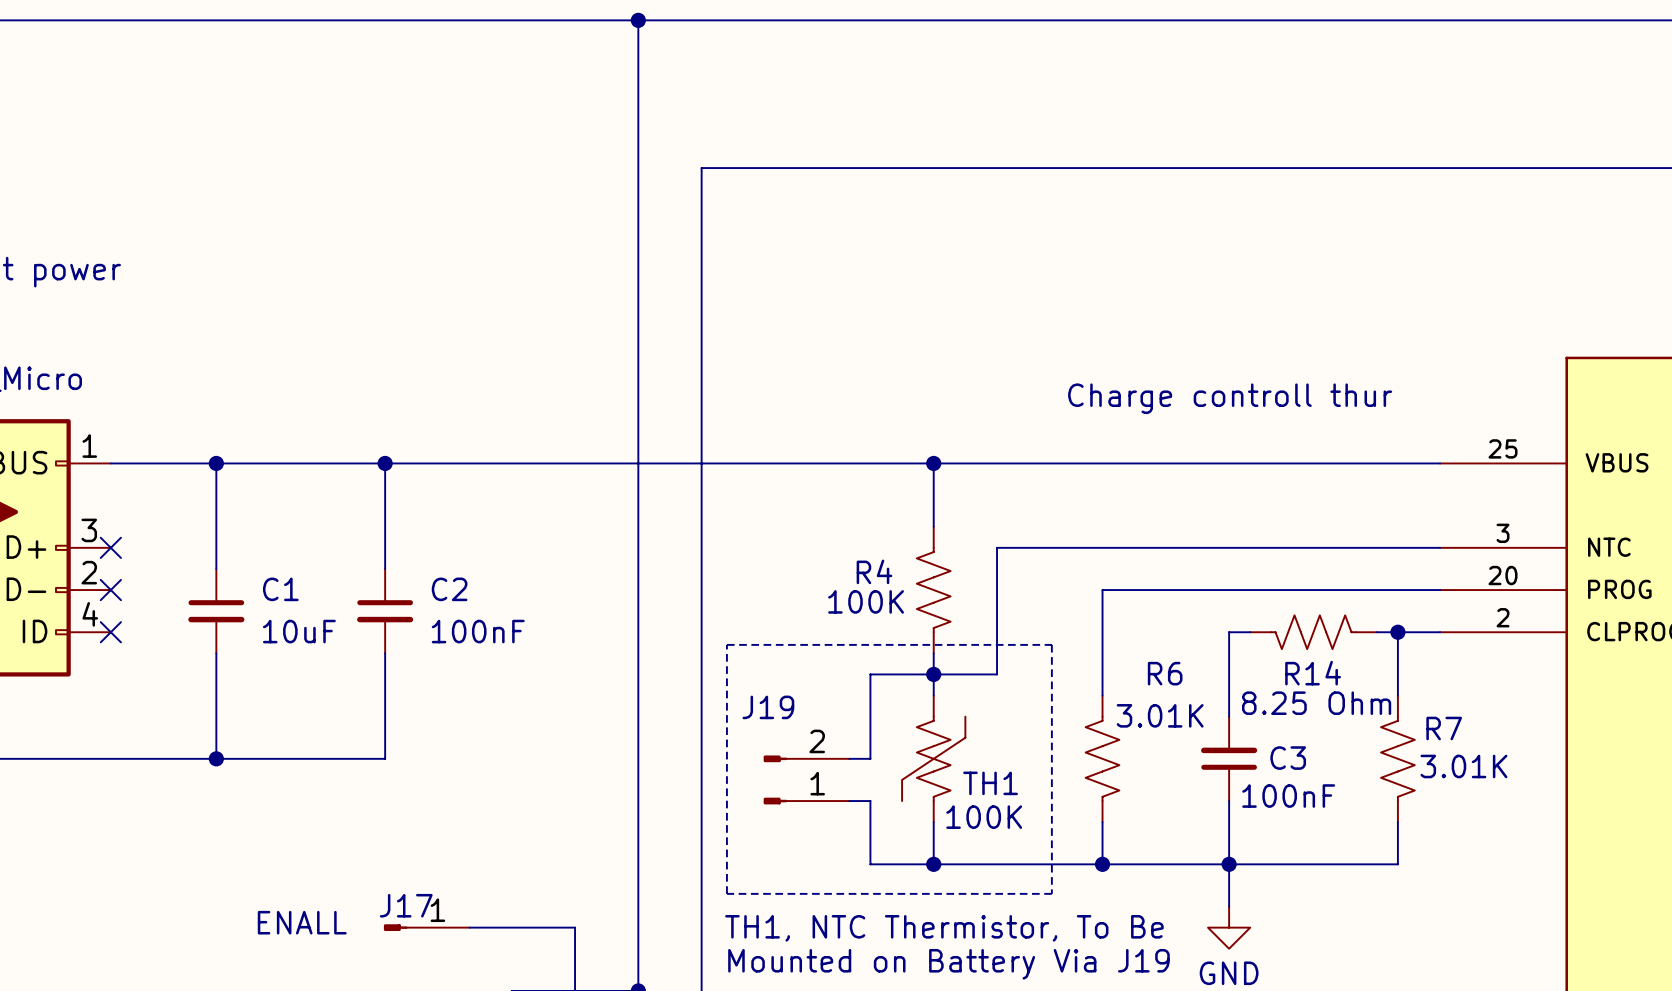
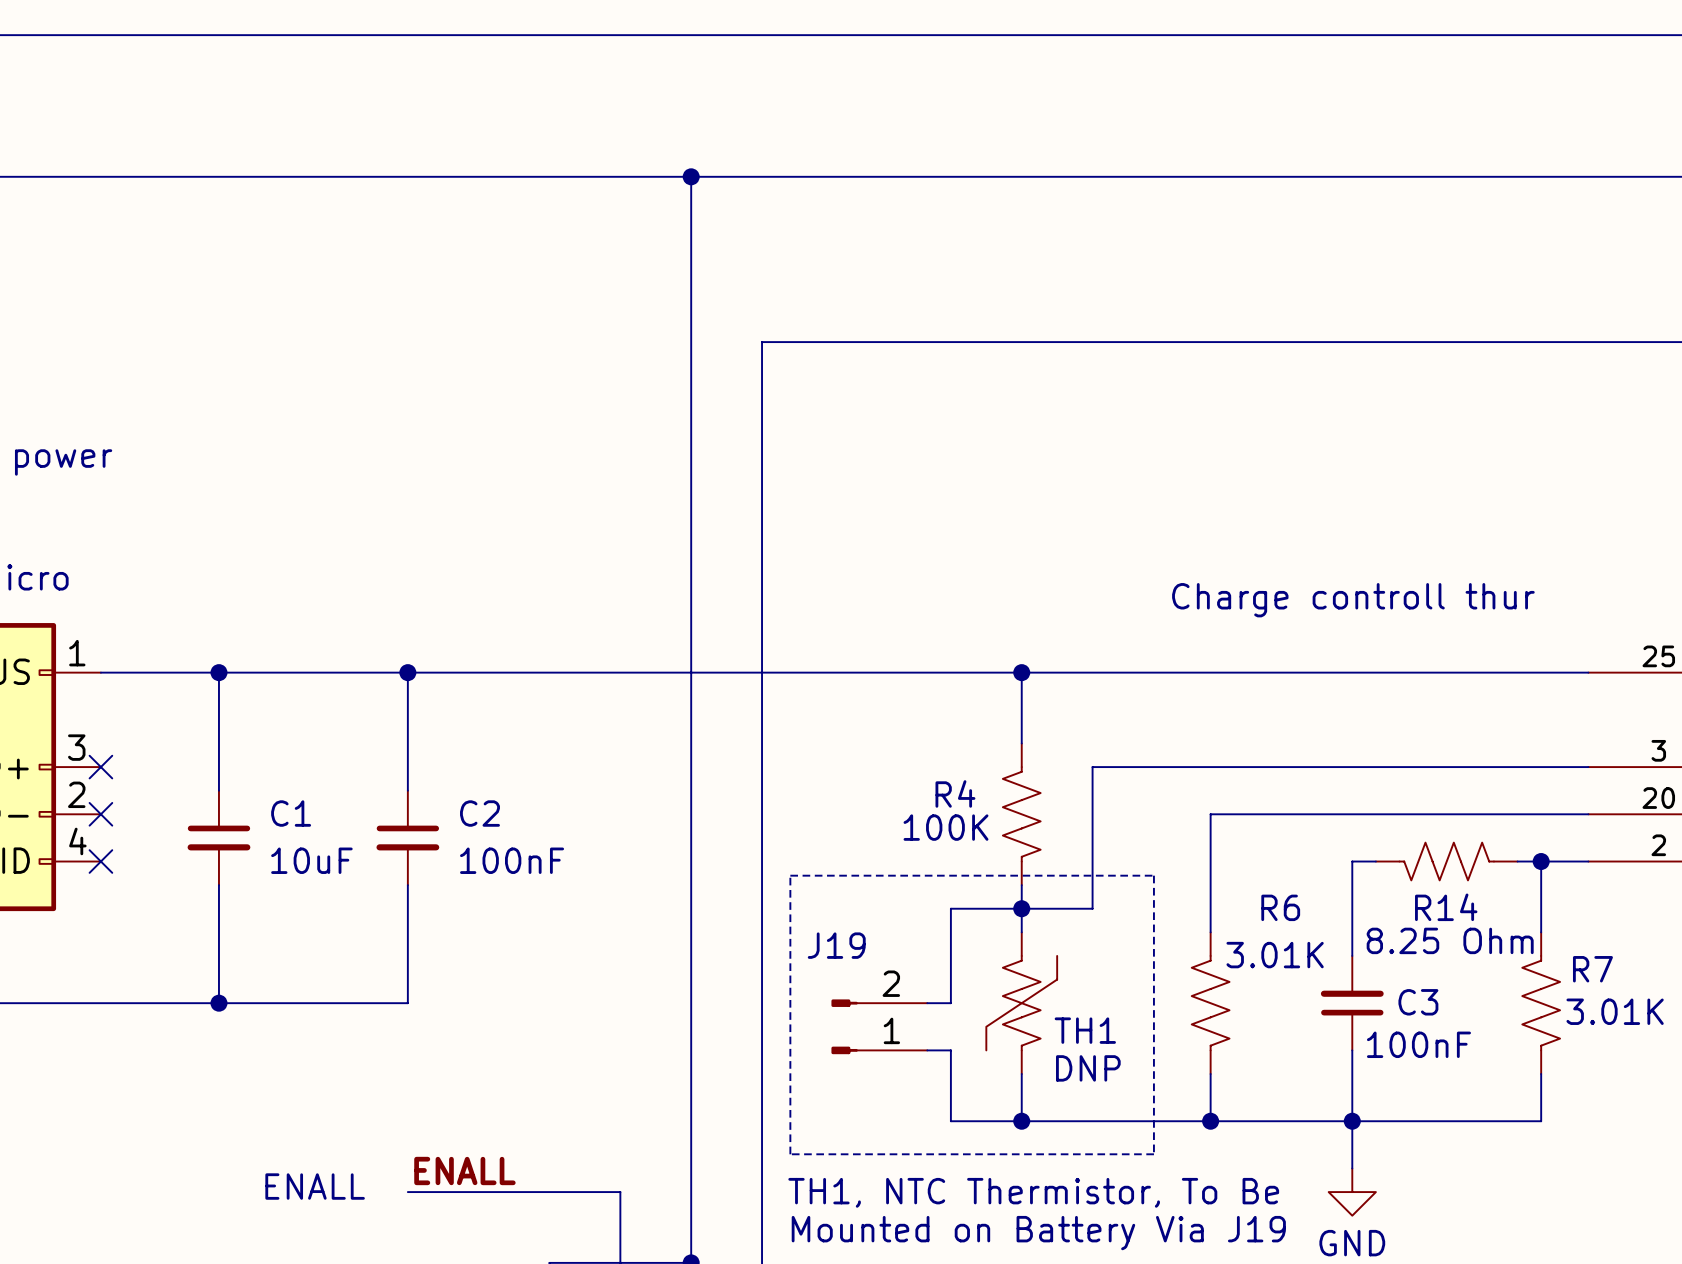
TH1 value: 100K (984, 817) -> DNP (1088, 1068)
label: none -> ENALL (464, 1170)
J17: (426, 927) -> none

